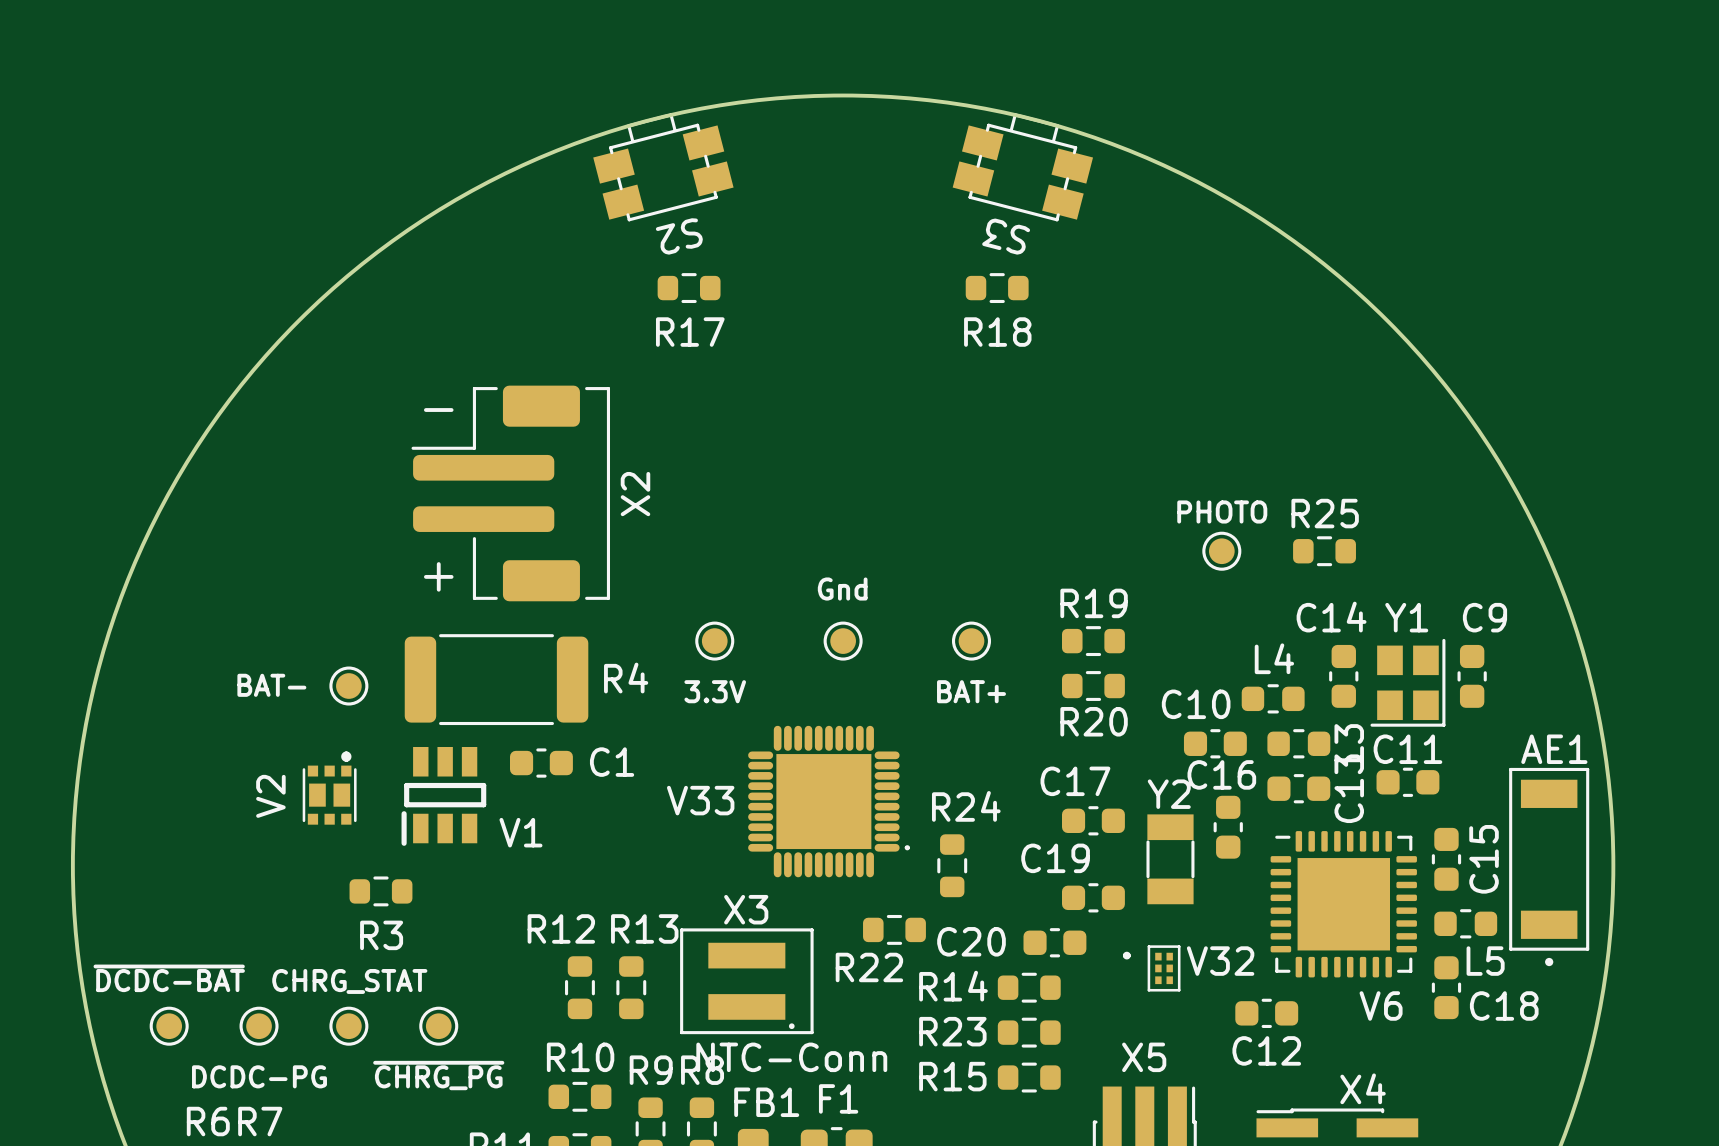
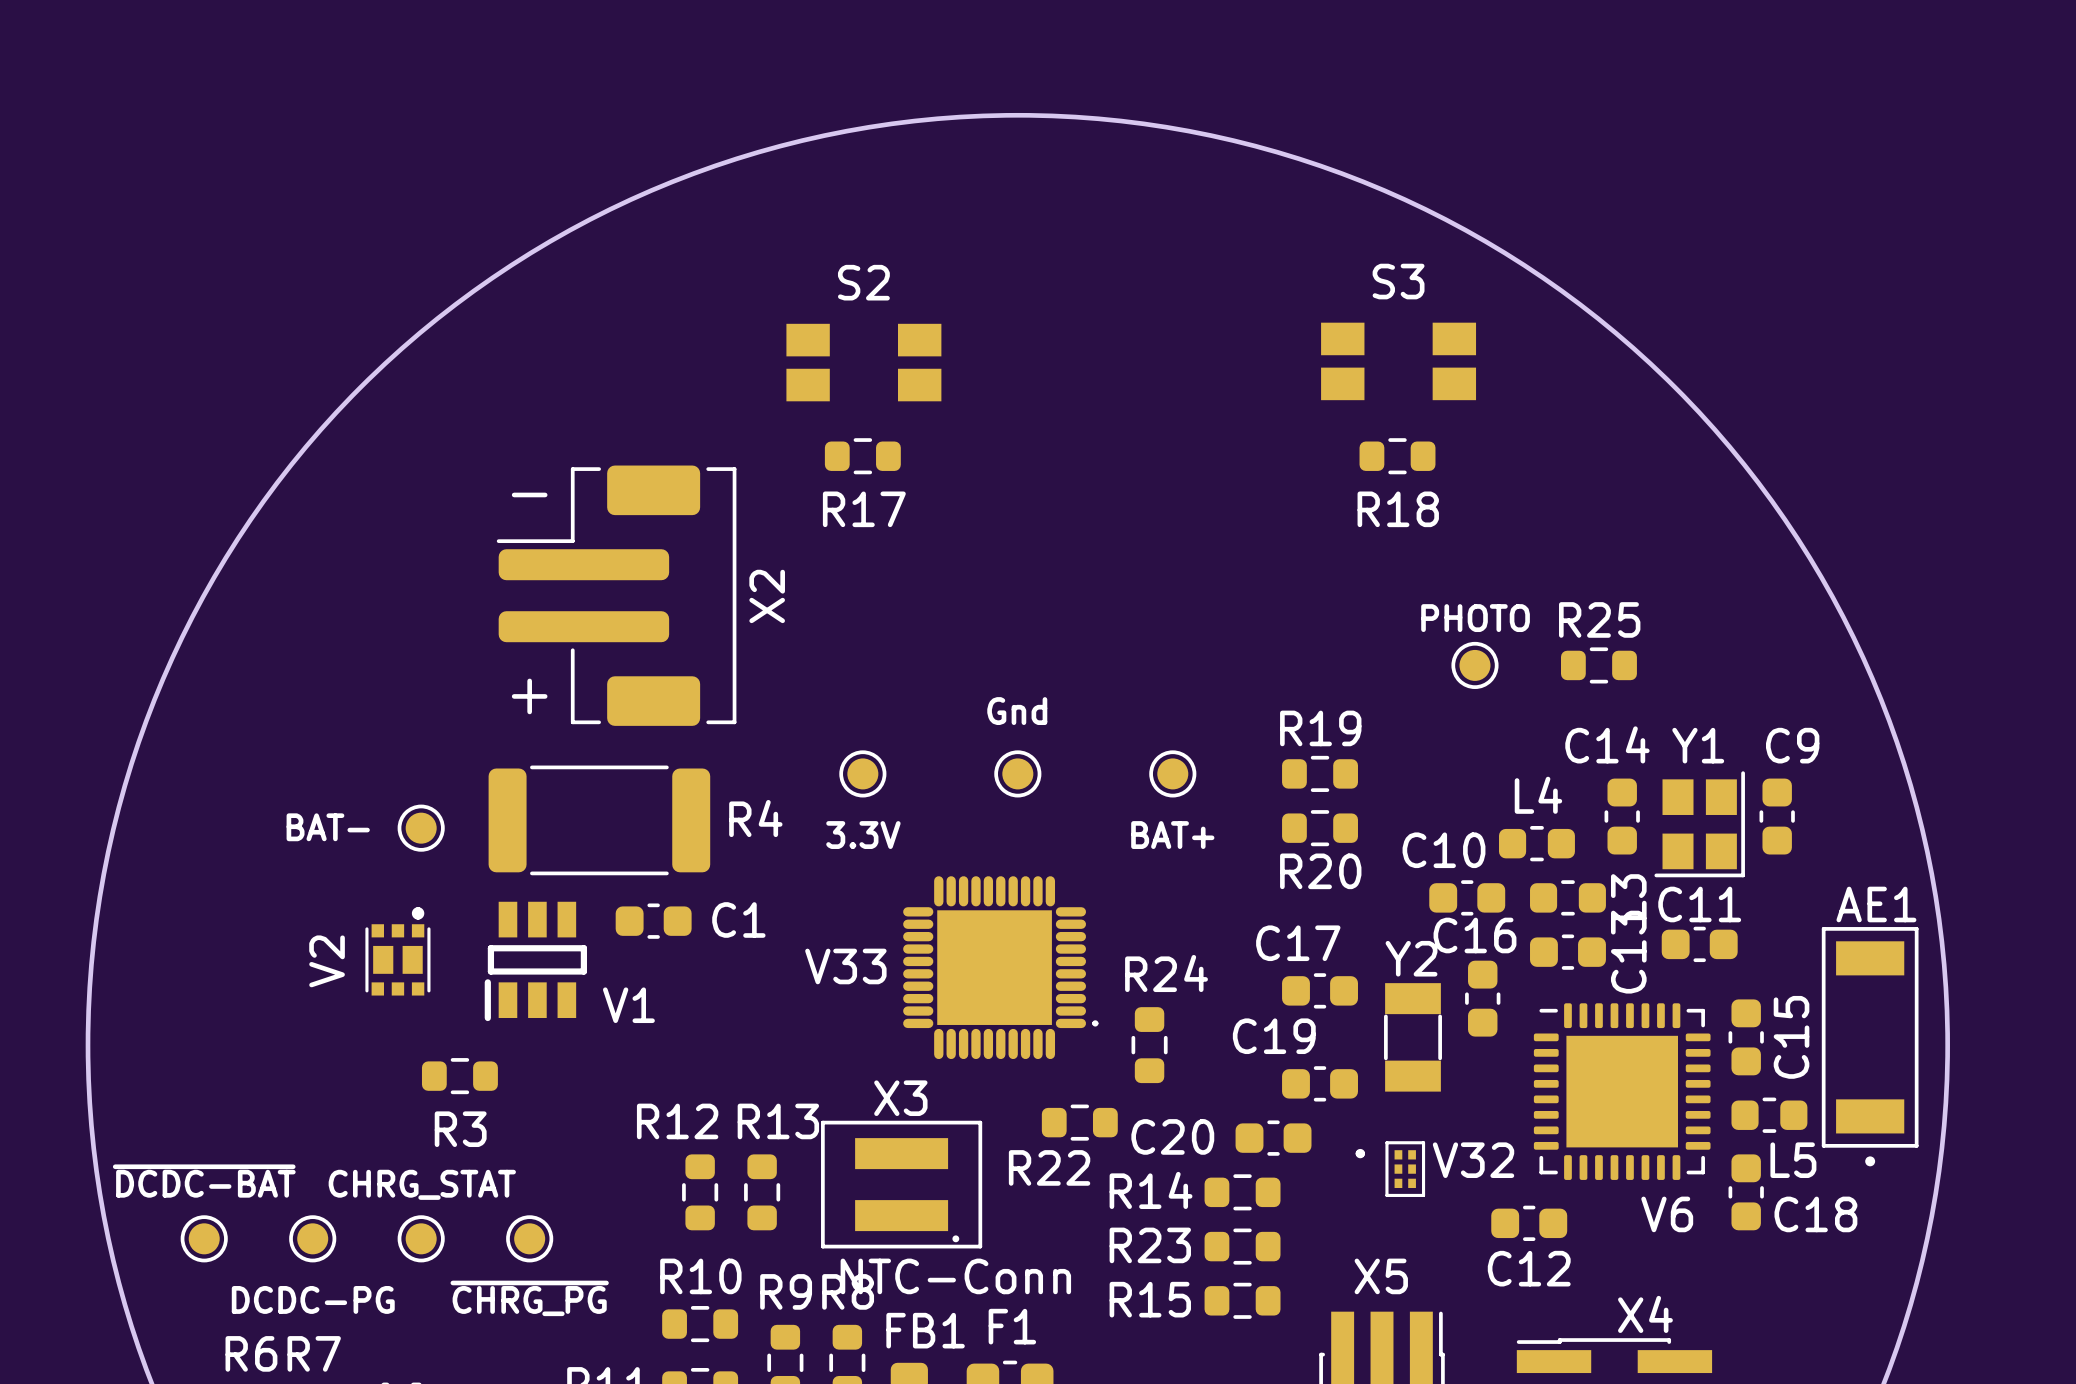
S2 footprint: [593, 113, 734, 222] -> [786, 323, 942, 402]
S3 footprint: [952, 113, 1094, 222] -> [1321, 322, 1477, 401]
S2 name position: S2 (679, 236) -> S2 (863, 282)
S3 name position: S3 (1006, 236) -> S3 (1398, 281)
R17 position: (689, 288) -> (862, 456)
R18 position: (997, 288) -> (1397, 456)

